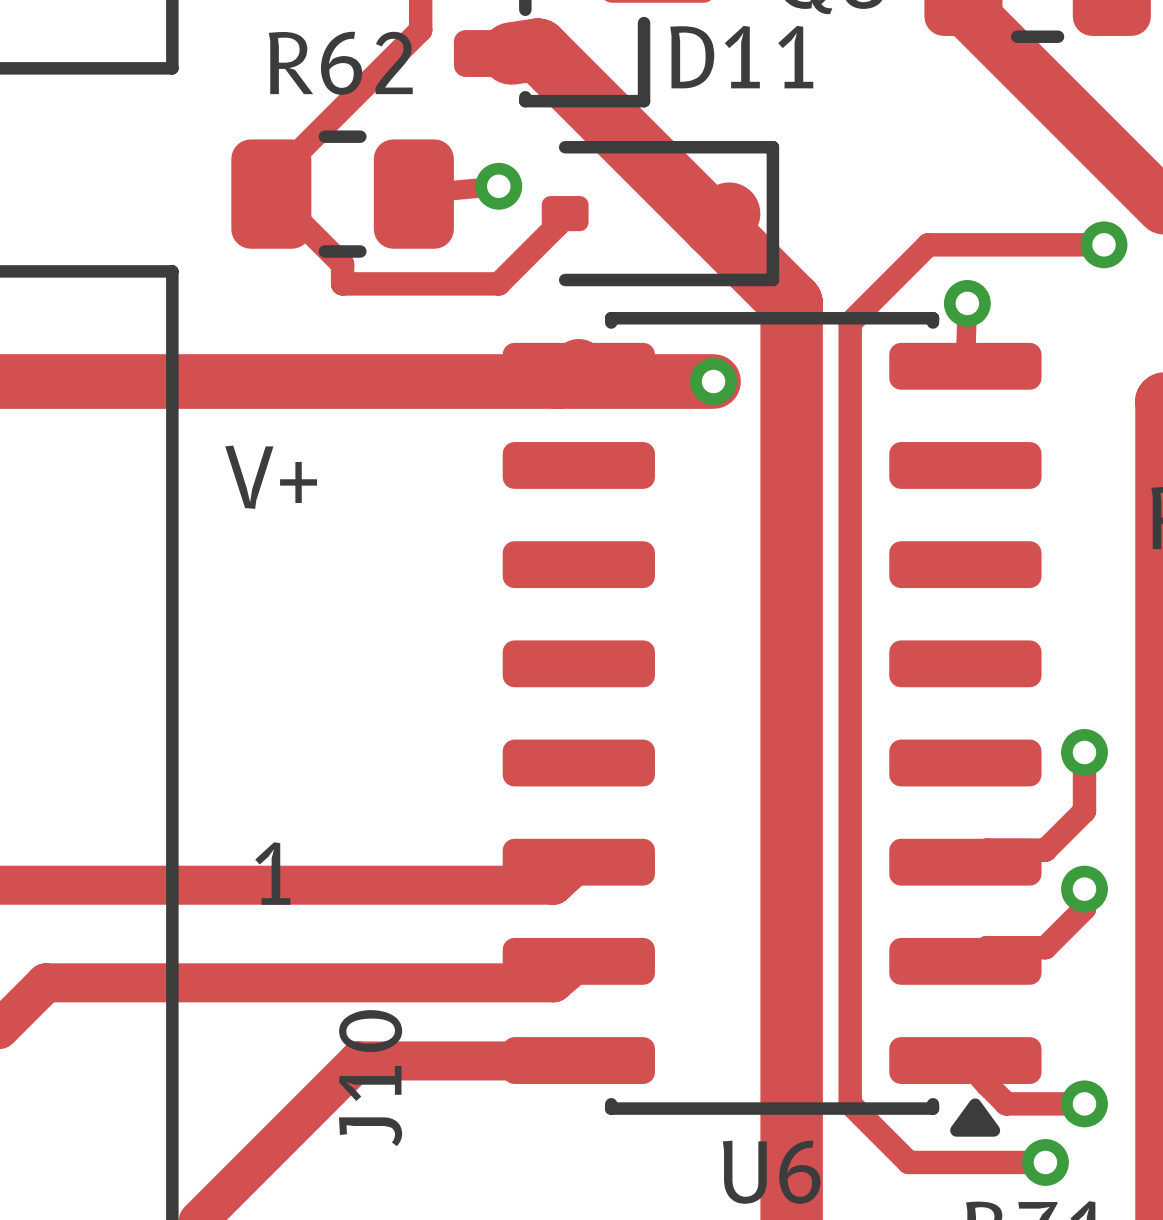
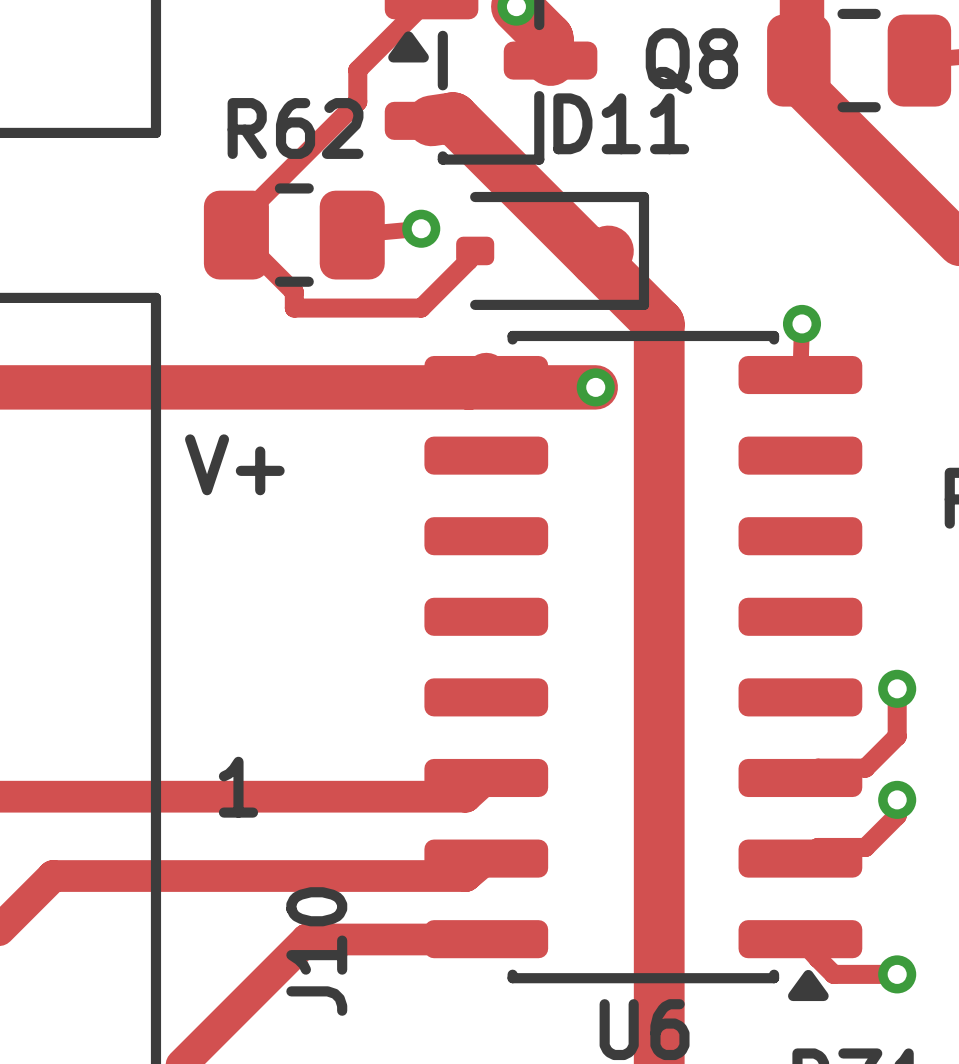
track: (1104, 244) (928, 244) (850, 322) (850, 1103) (908, 1162) (1045, 1162) -> none
via: (1104, 244) -> none
via: (1045, 1162) -> none

